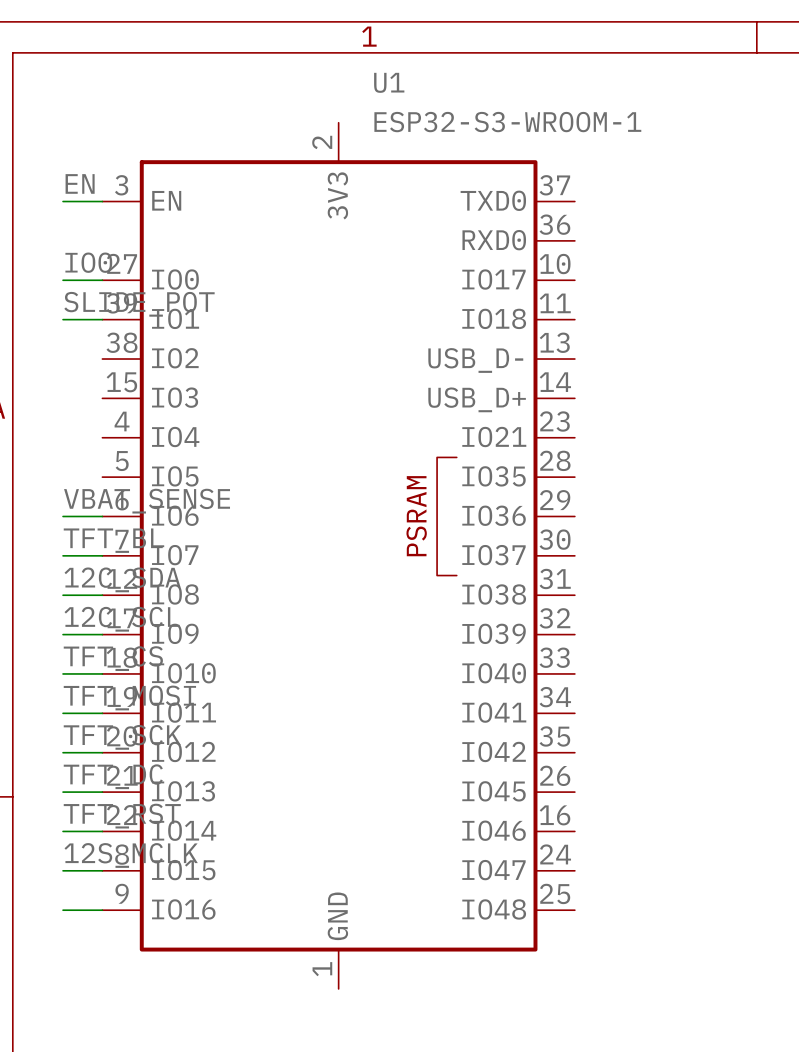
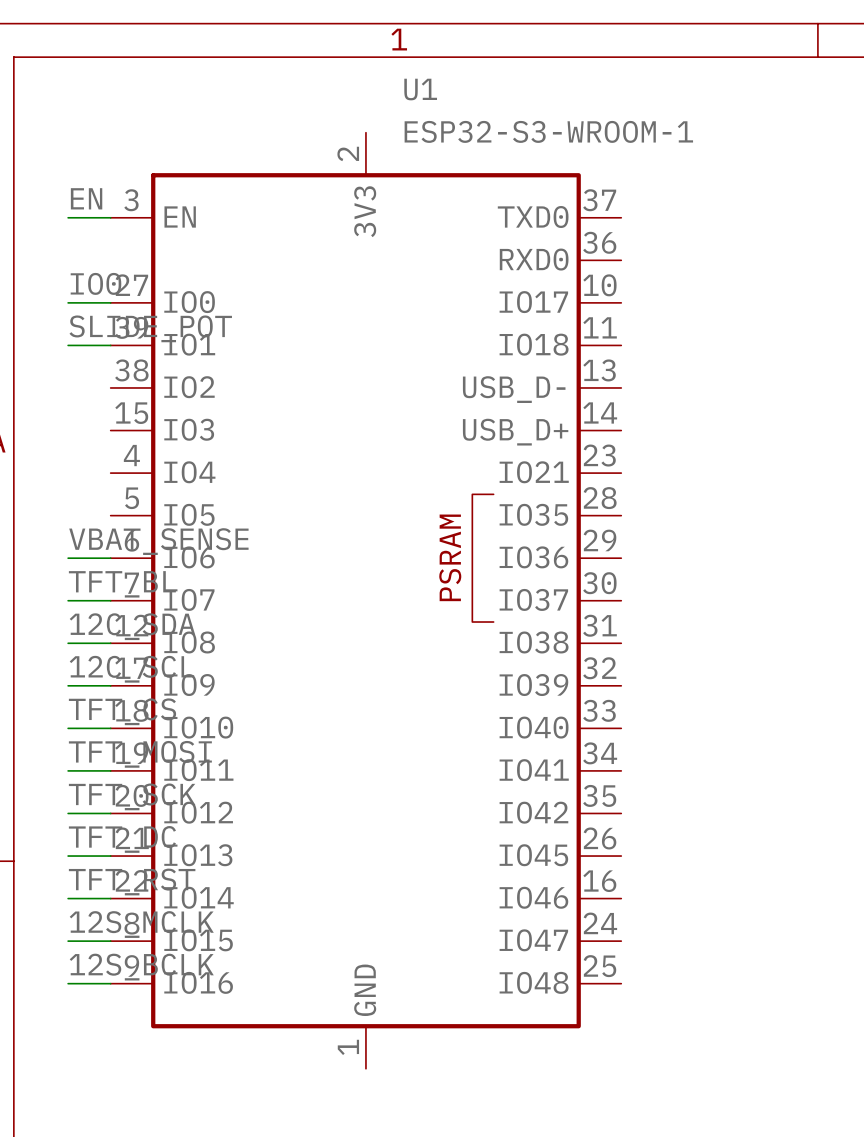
label: none -> 12S_BCLK (141, 967)

